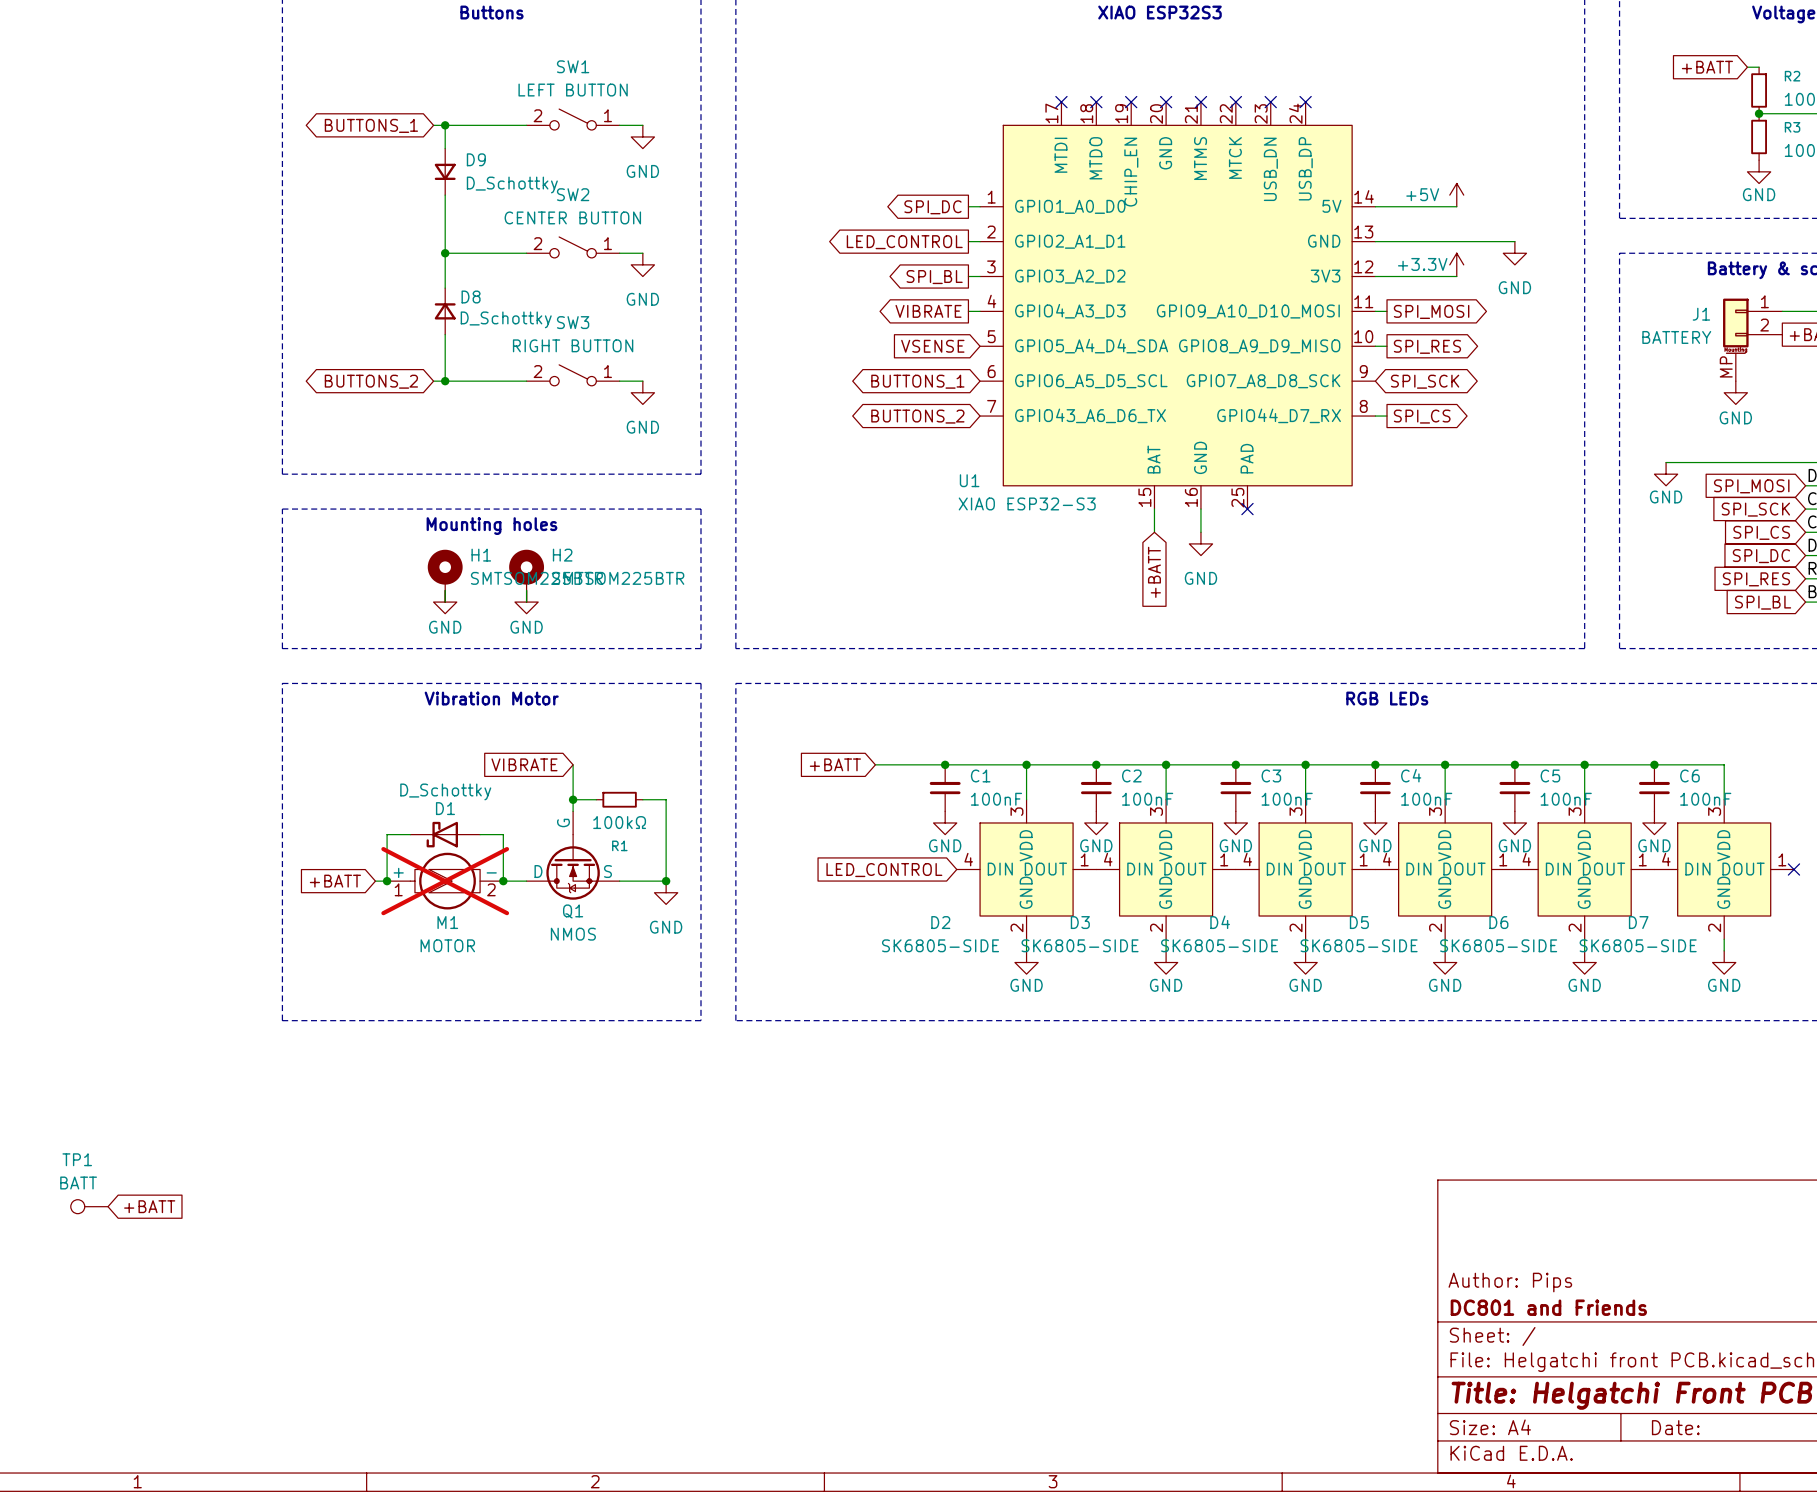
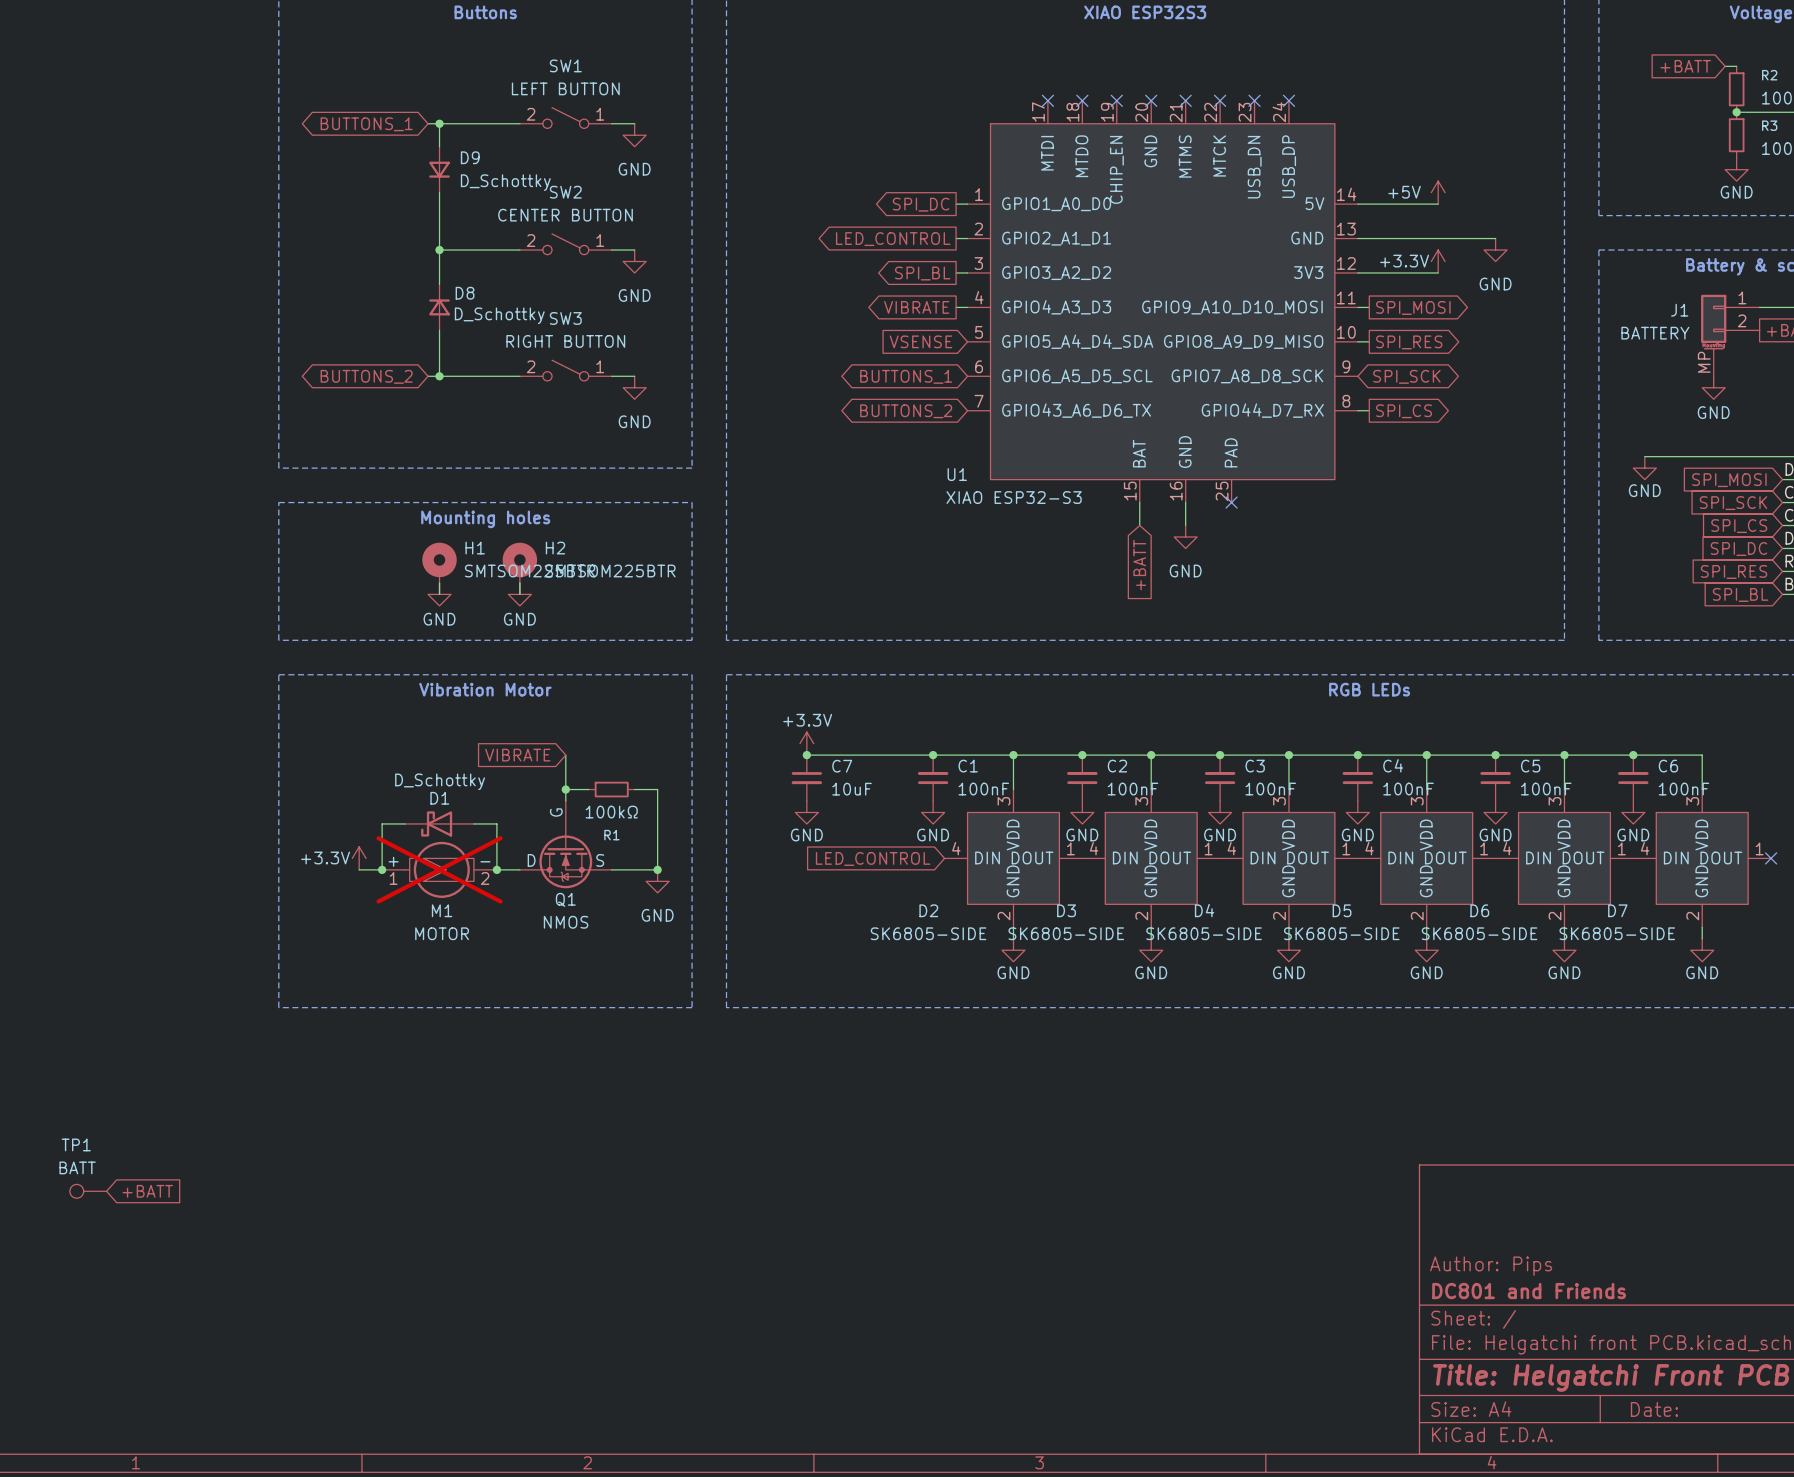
power symbol: none -> +3.3V (806, 743)
wire: none -> (806, 755) (864, 755)
junction: none -> (806, 755)
global label: +BATT (835, 764) -> none
C7: none -> 10uF (806, 778)
power symbol: none -> GND (806, 812)
power symbol: none -> +3.3V (359, 858)
global label: +BATT (335, 881) -> none
wire: none -> (359, 869) (370, 869)

